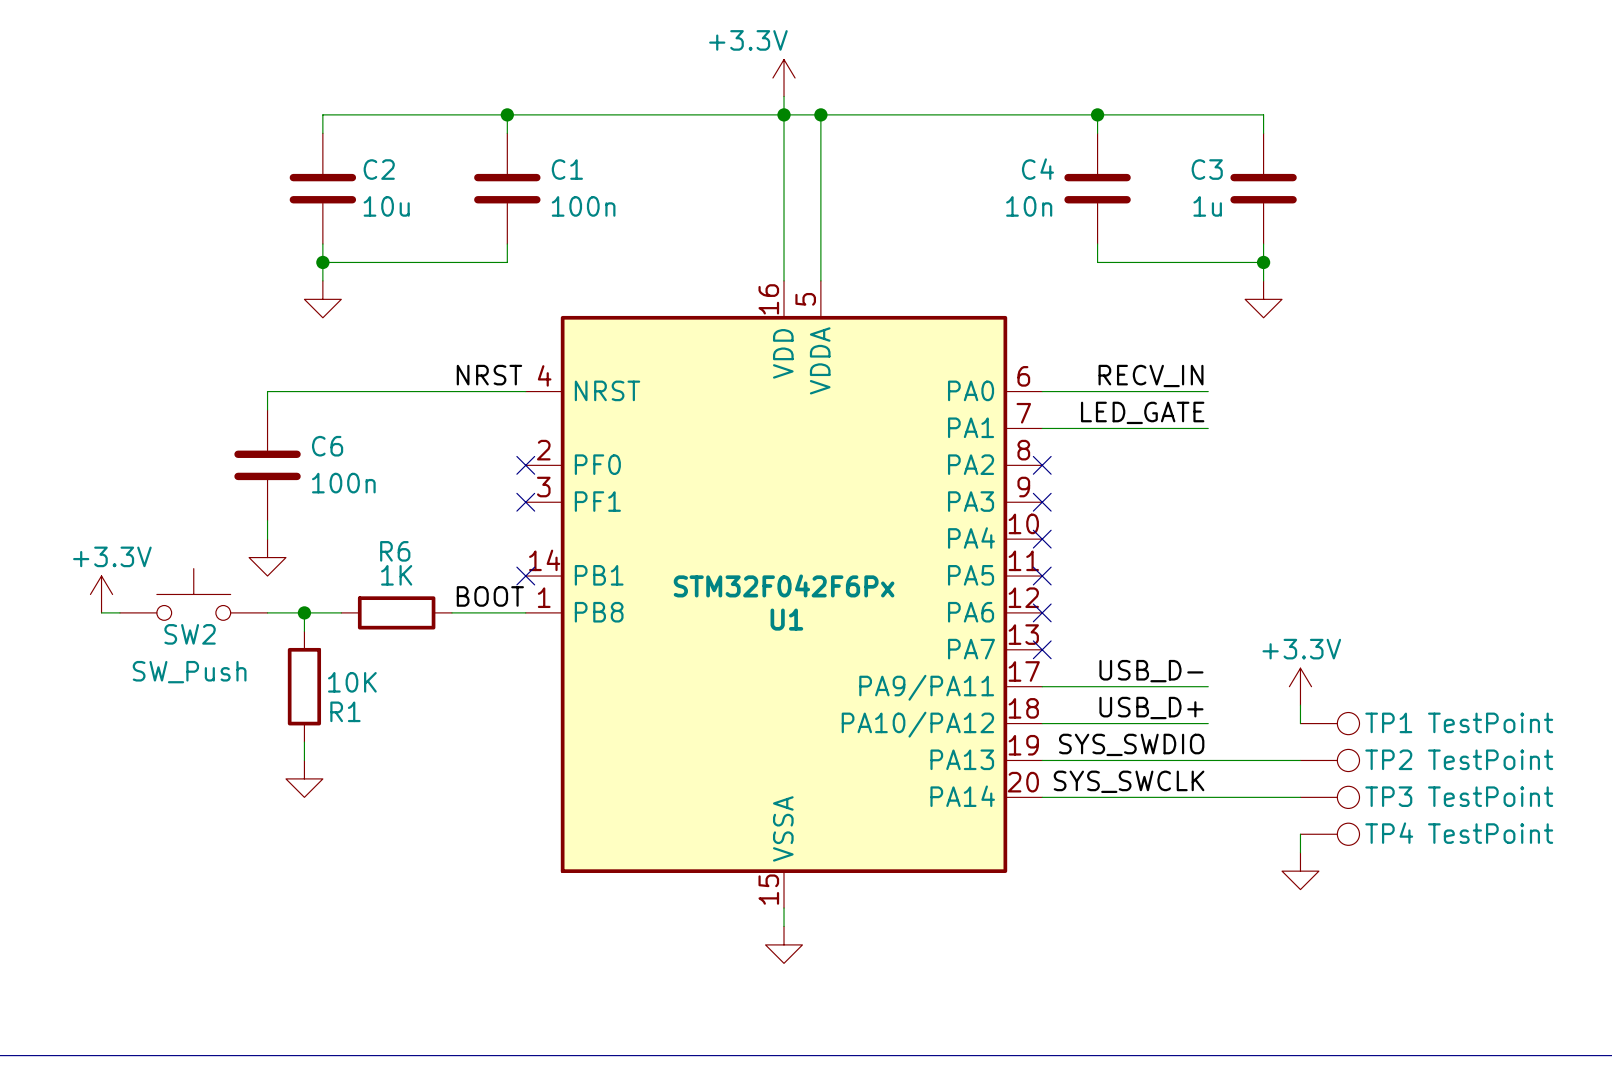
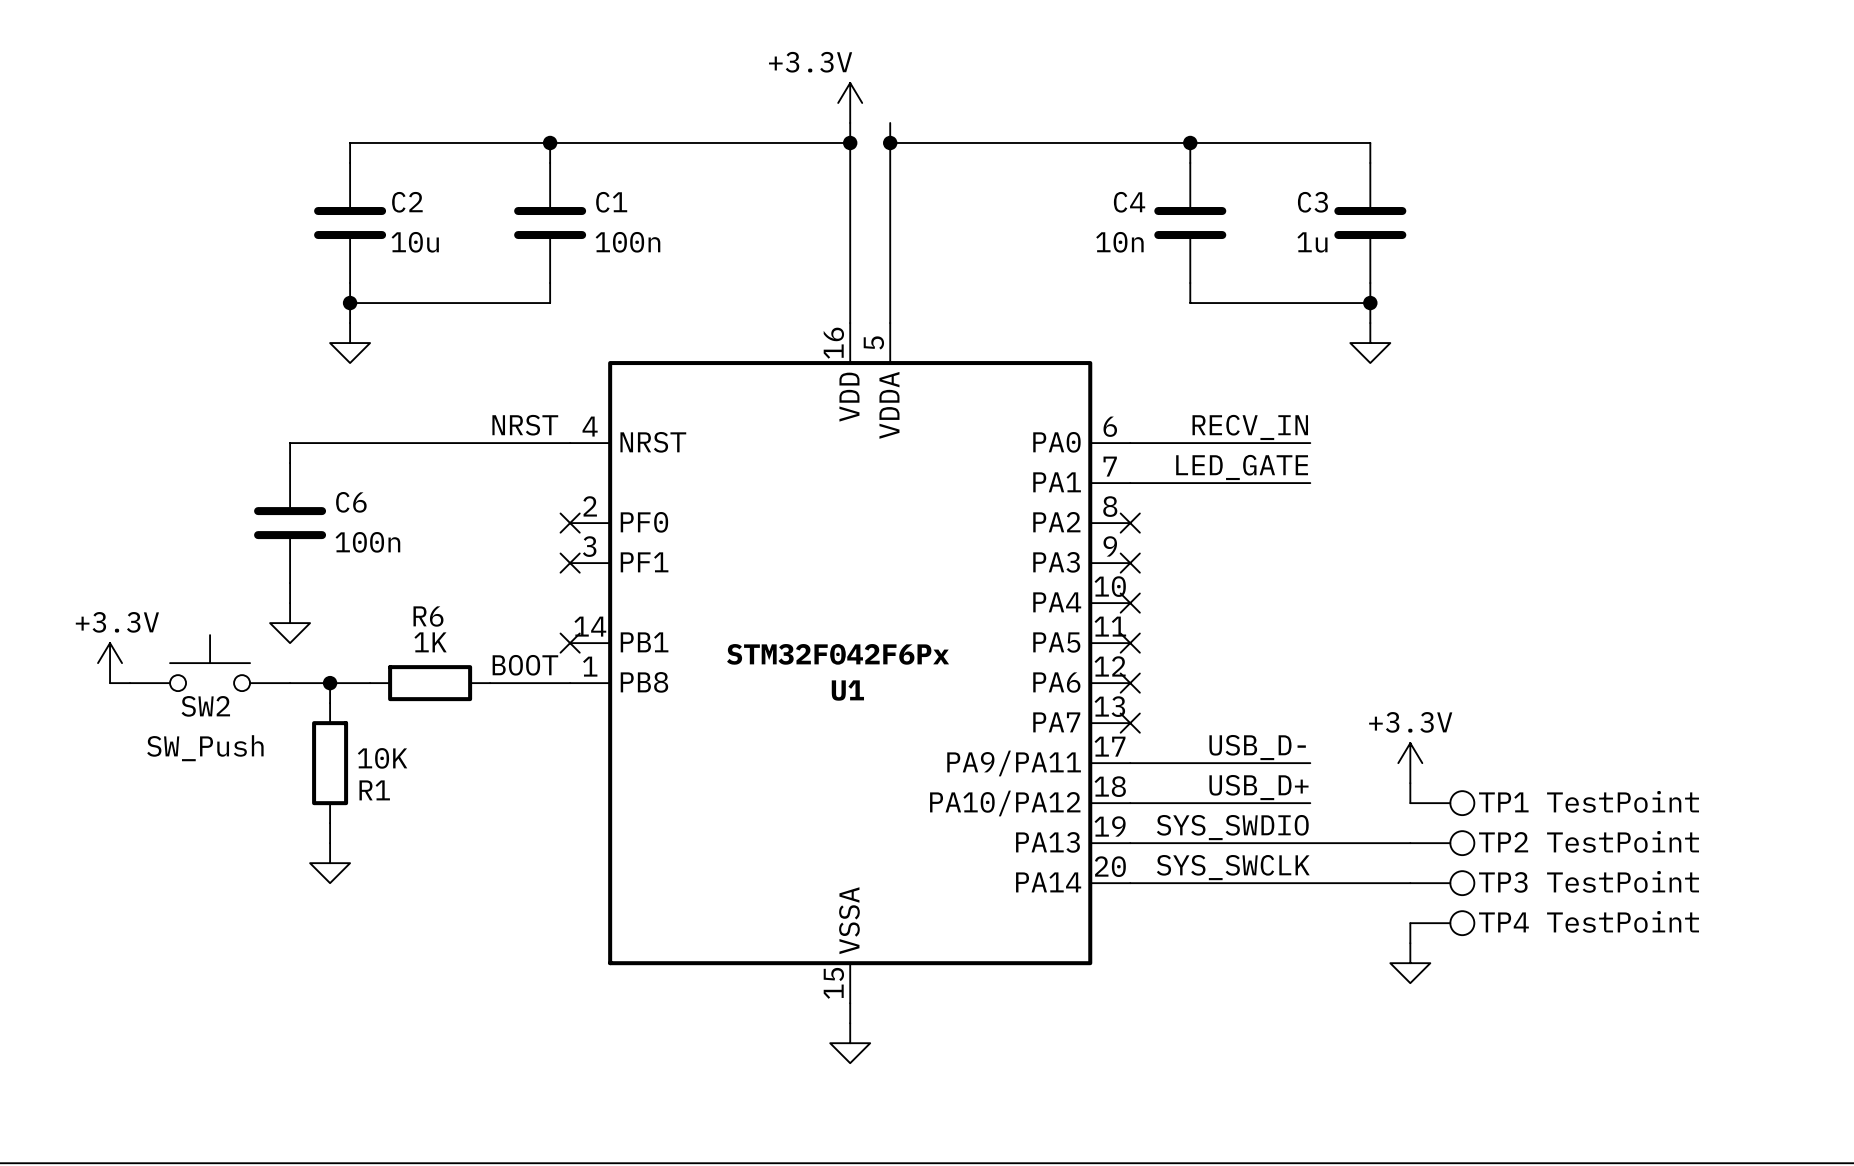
wire: (784, 114) (820, 114) -> (890, 122) (890, 142)

